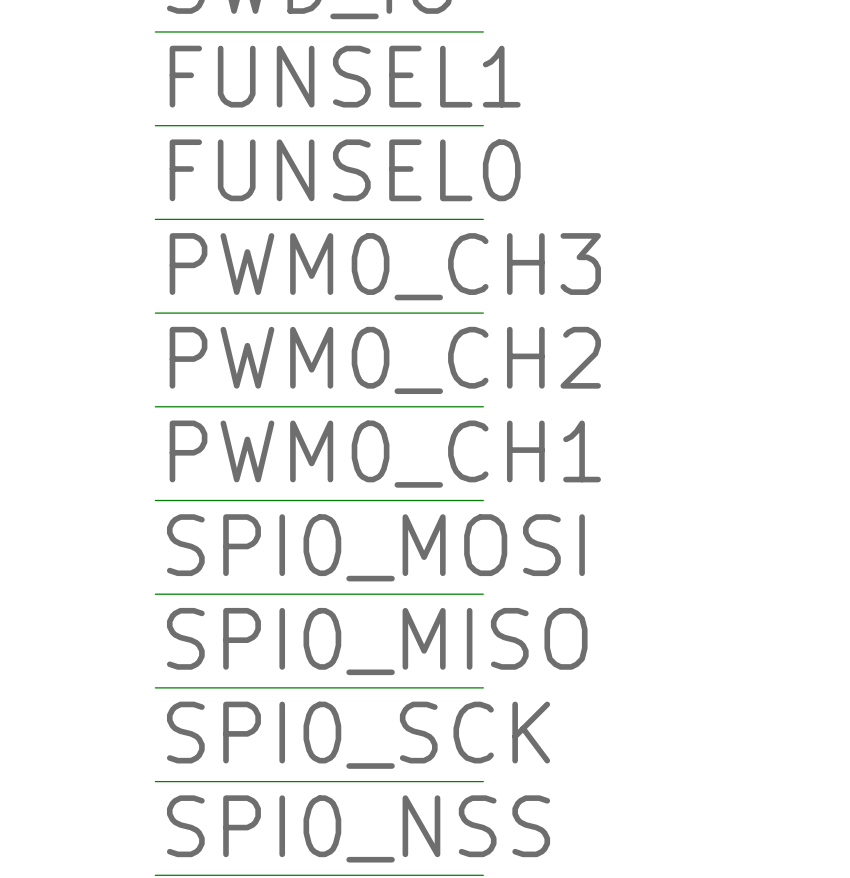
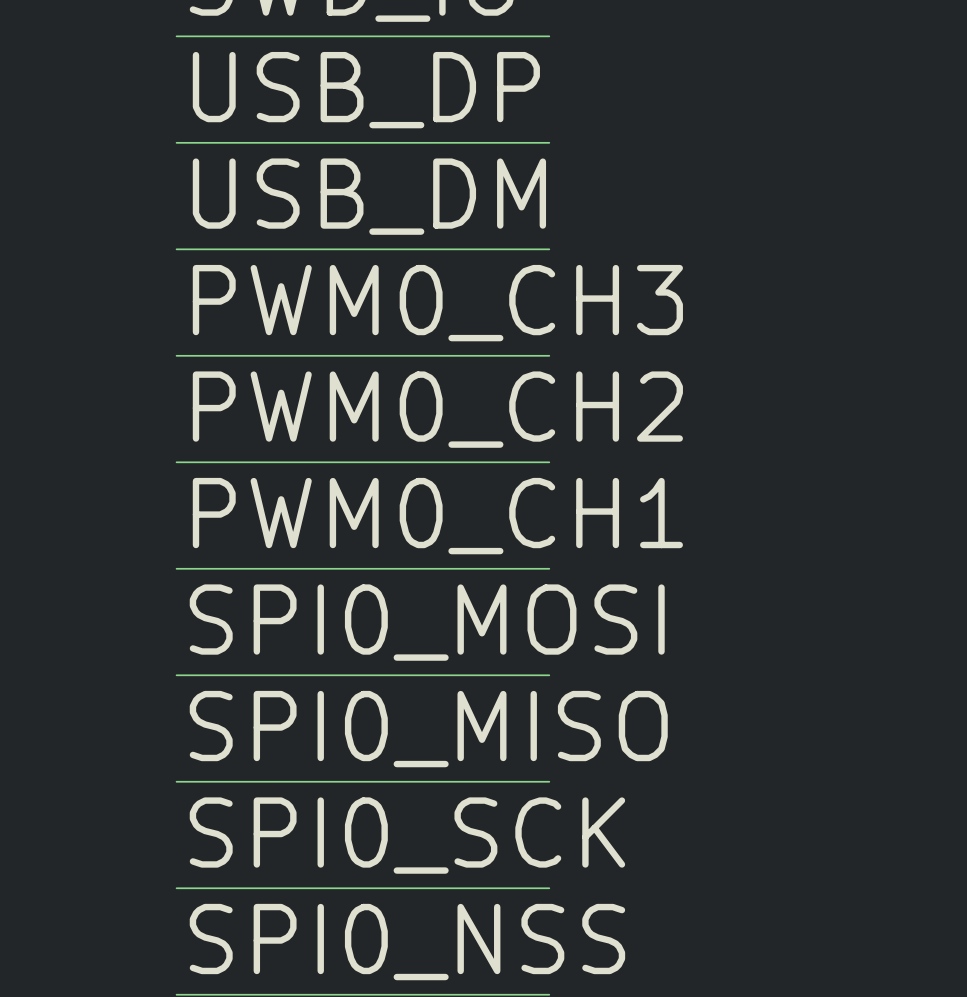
label: FUNSEL1 (345, 76) -> USB_DP (366, 90)
label: FUNSEL0 (345, 170) -> USB_DM (369, 196)

